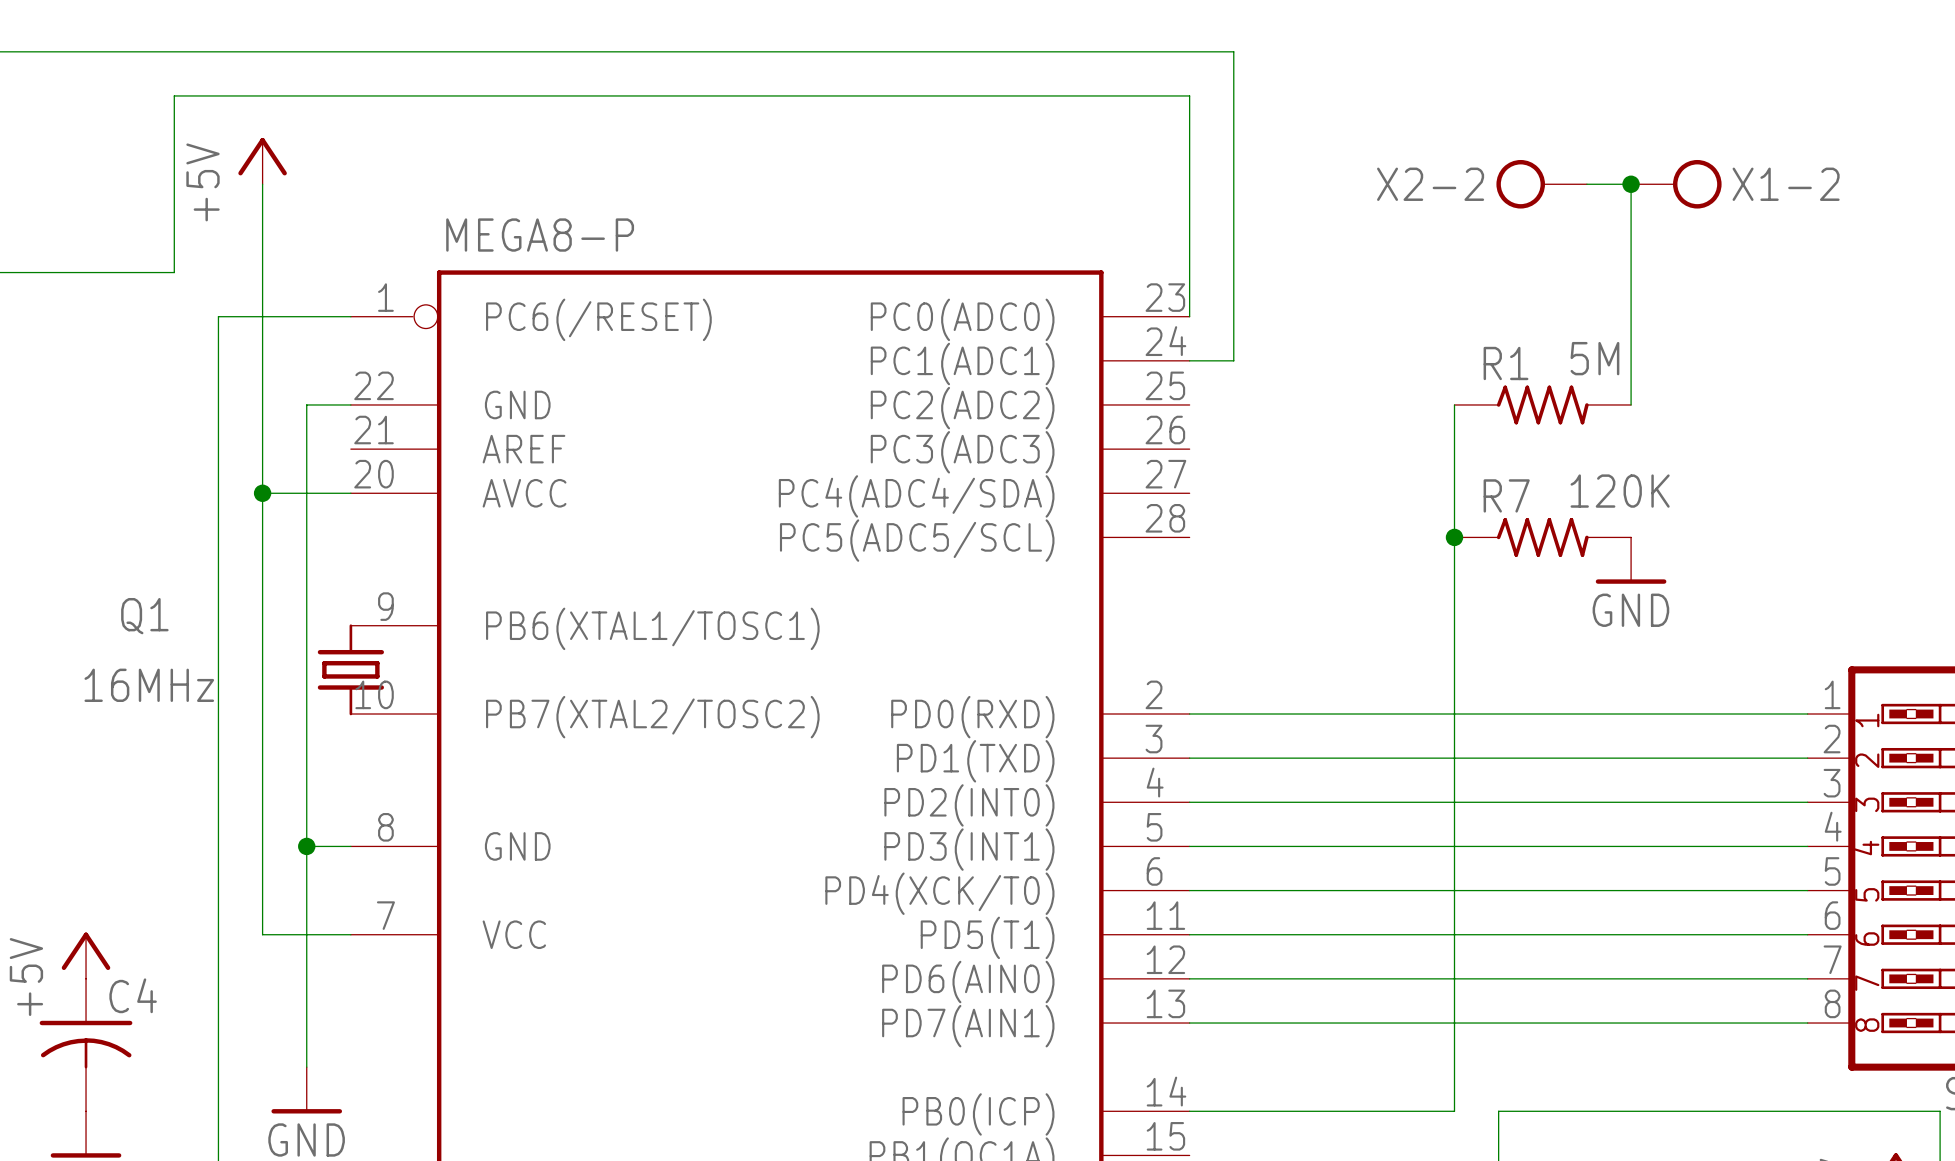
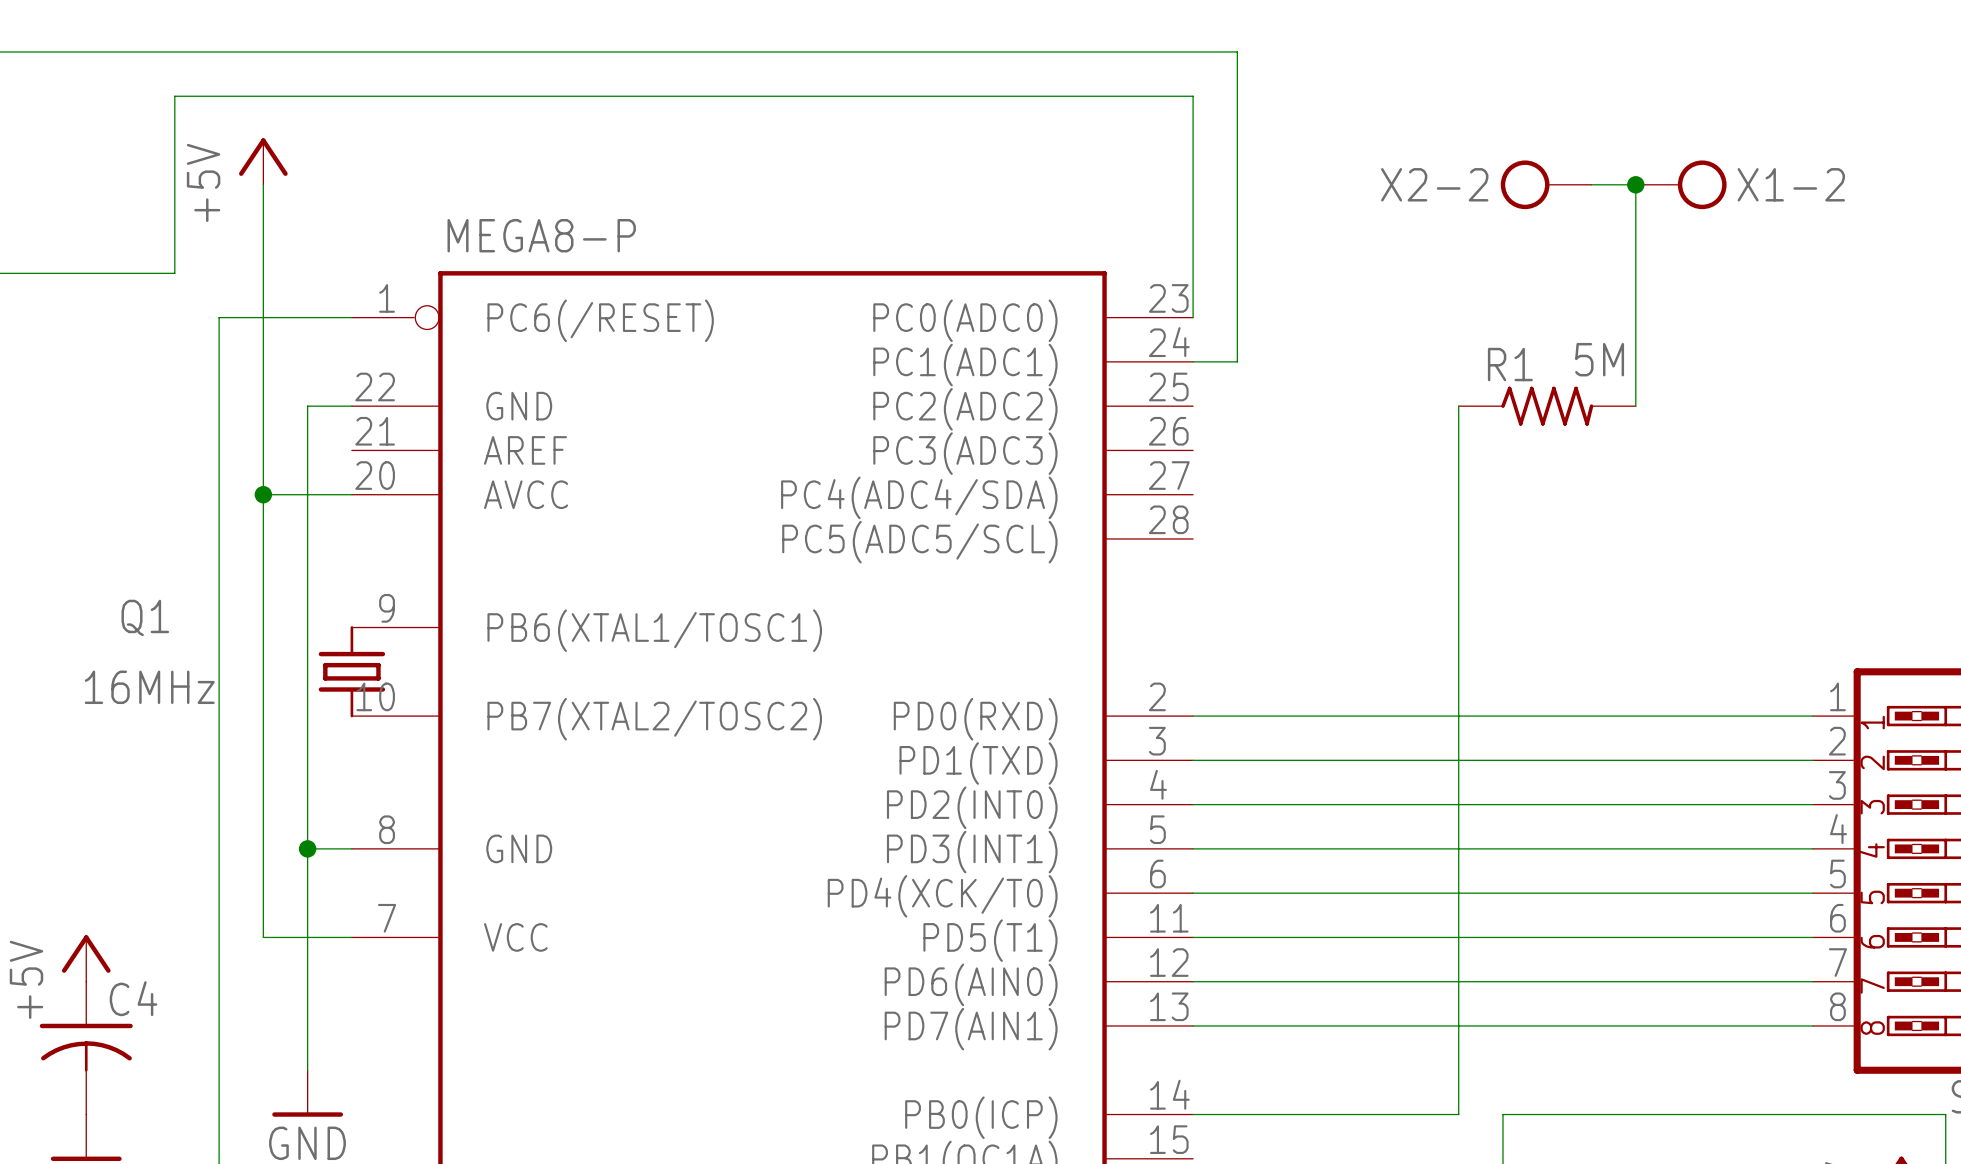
junction: (1454, 537) -> none
R7: 120K (1542, 537) -> none
power symbol: GND (1631, 560) -> none

